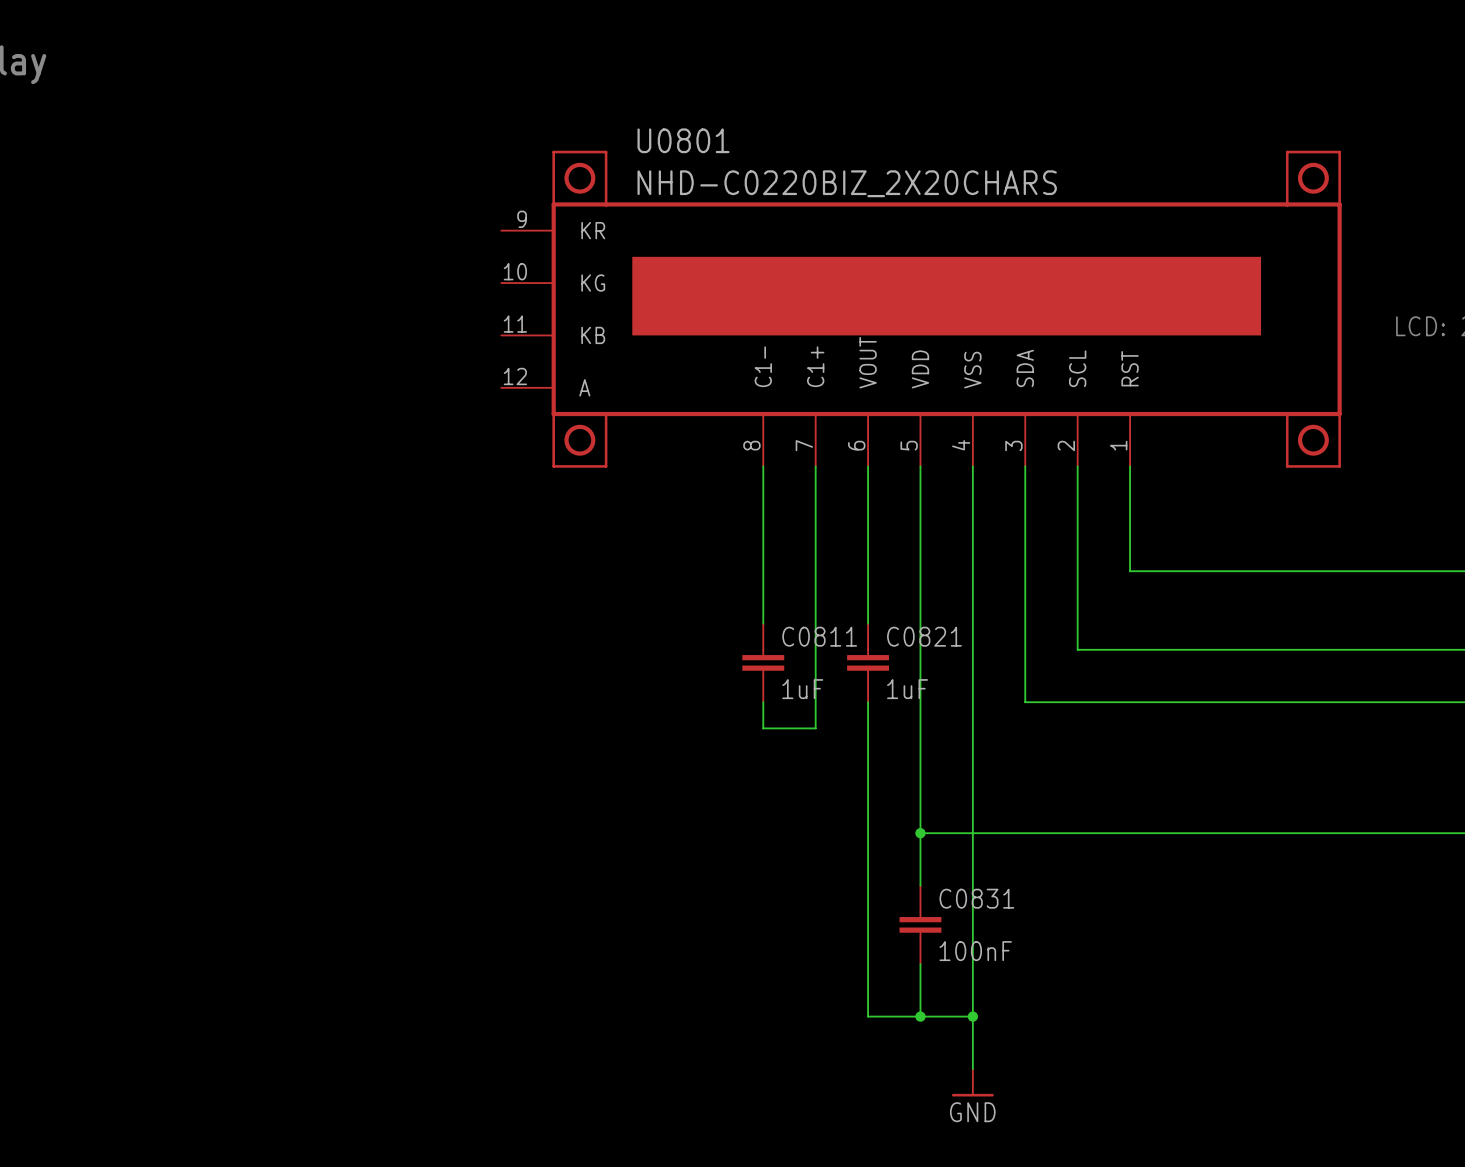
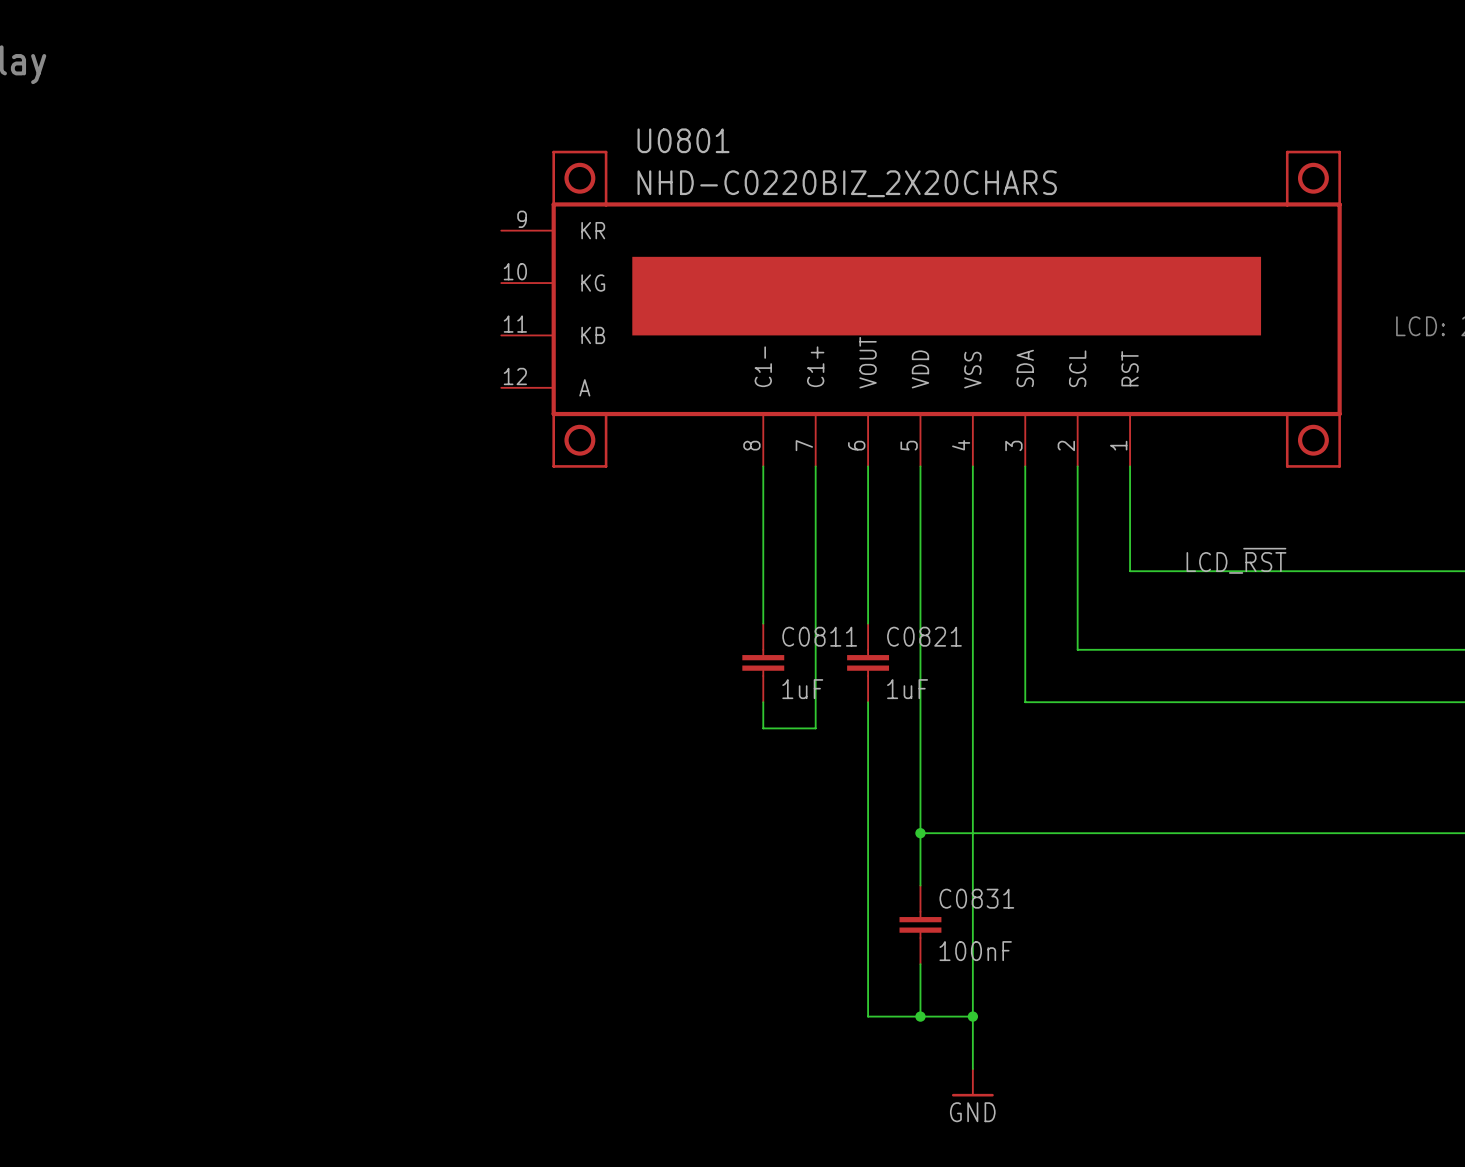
label: none -> LCD_~{RST} (1236, 560)

